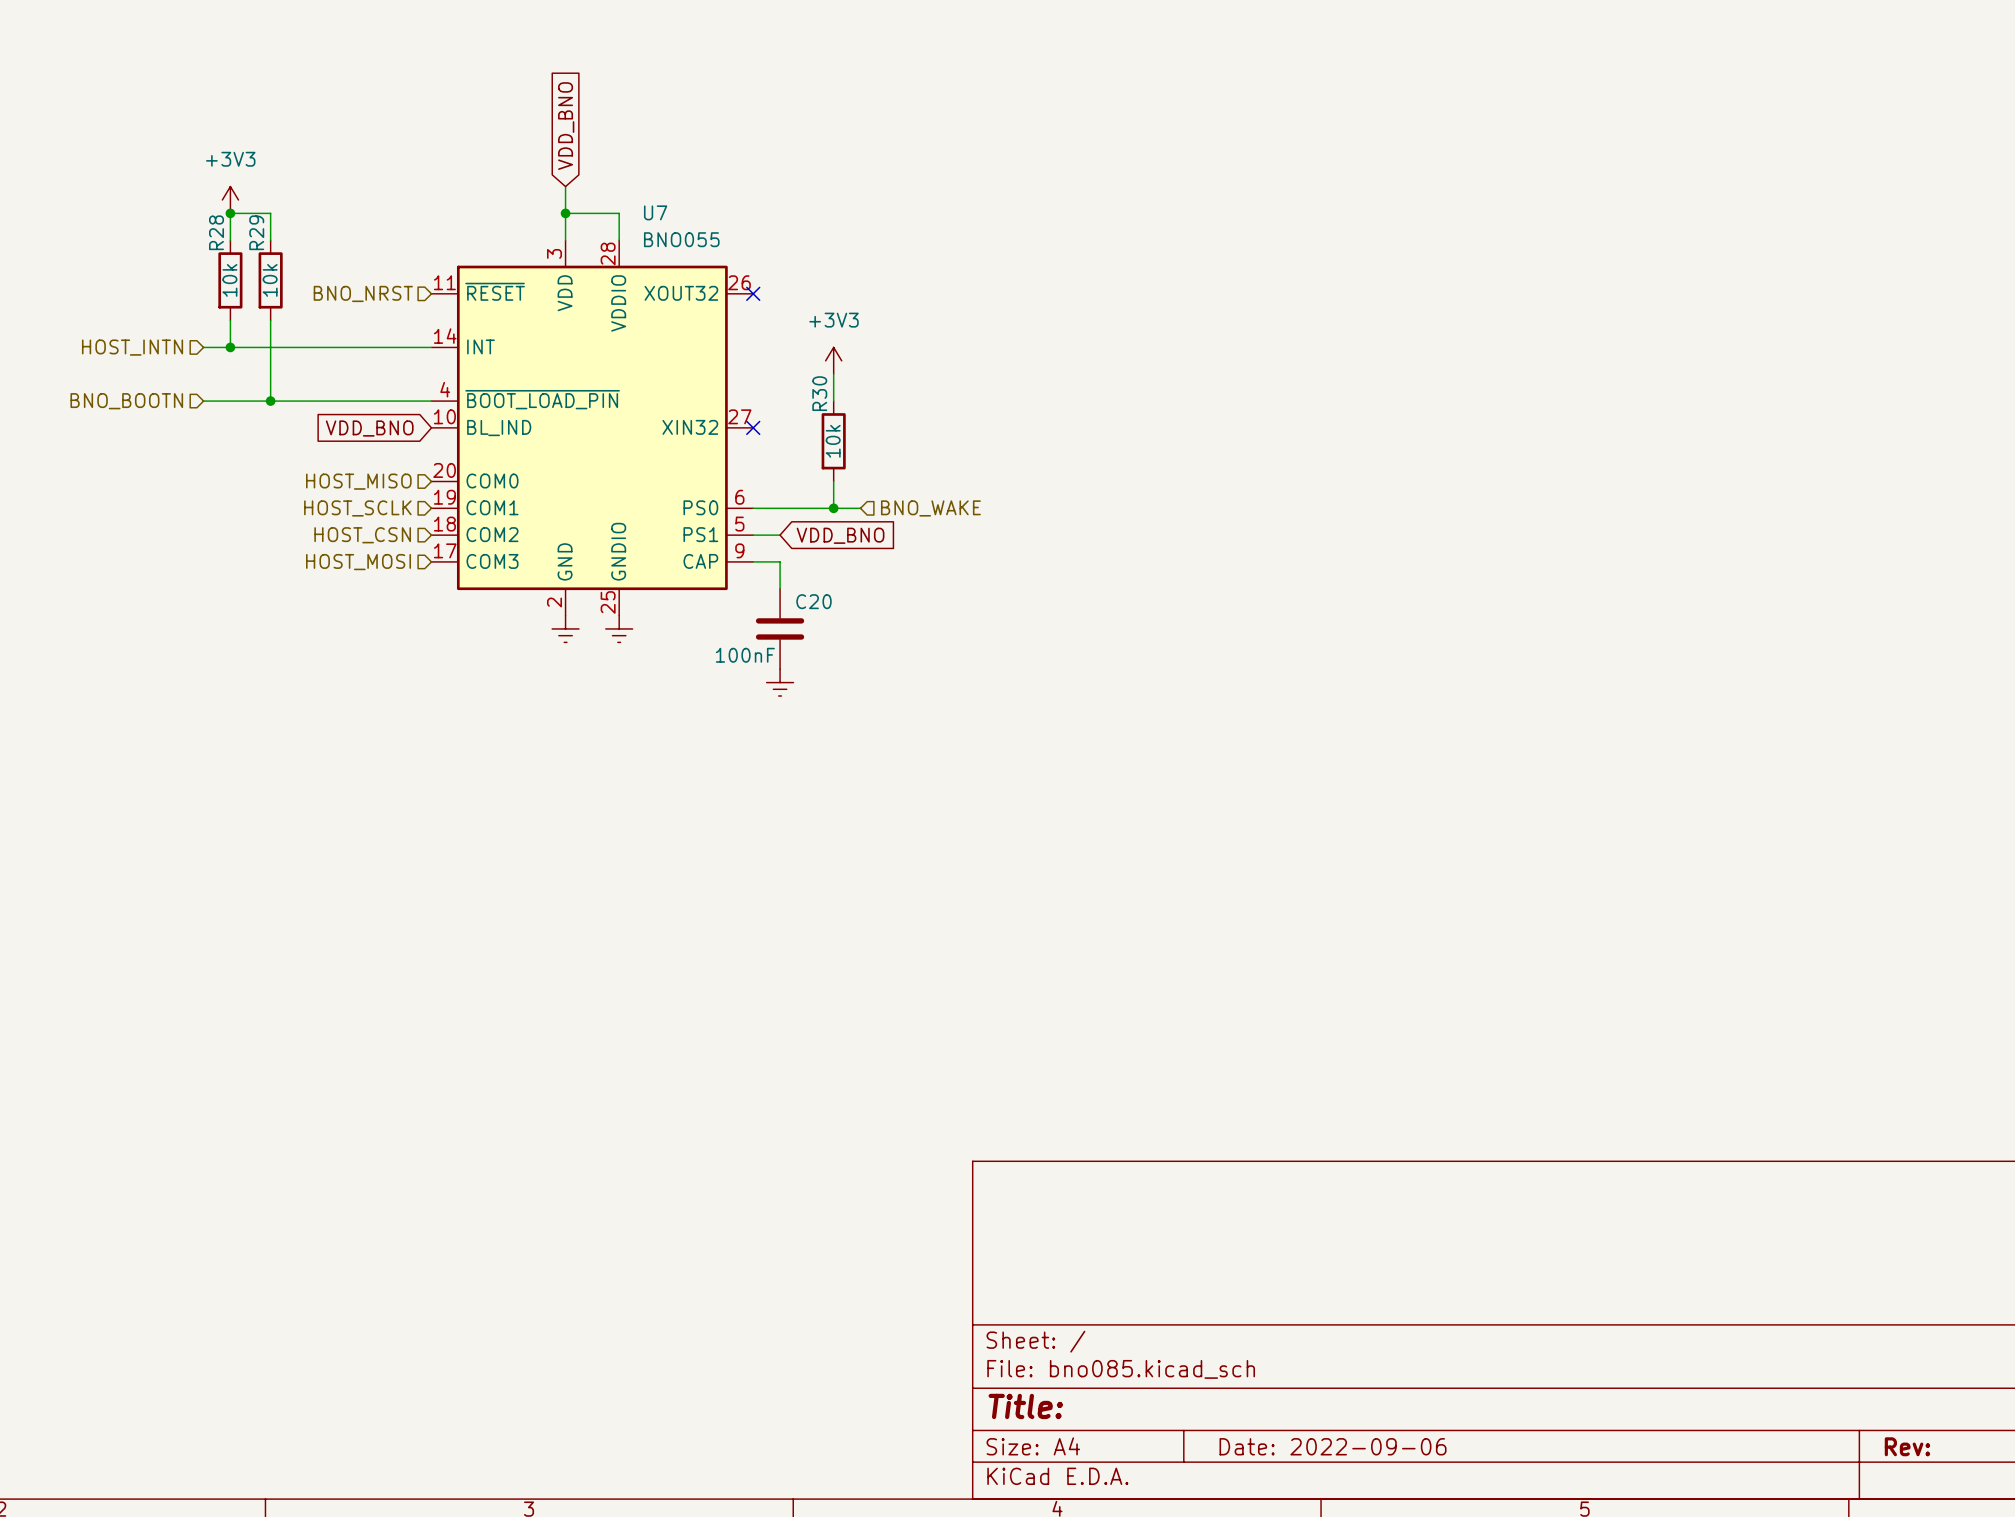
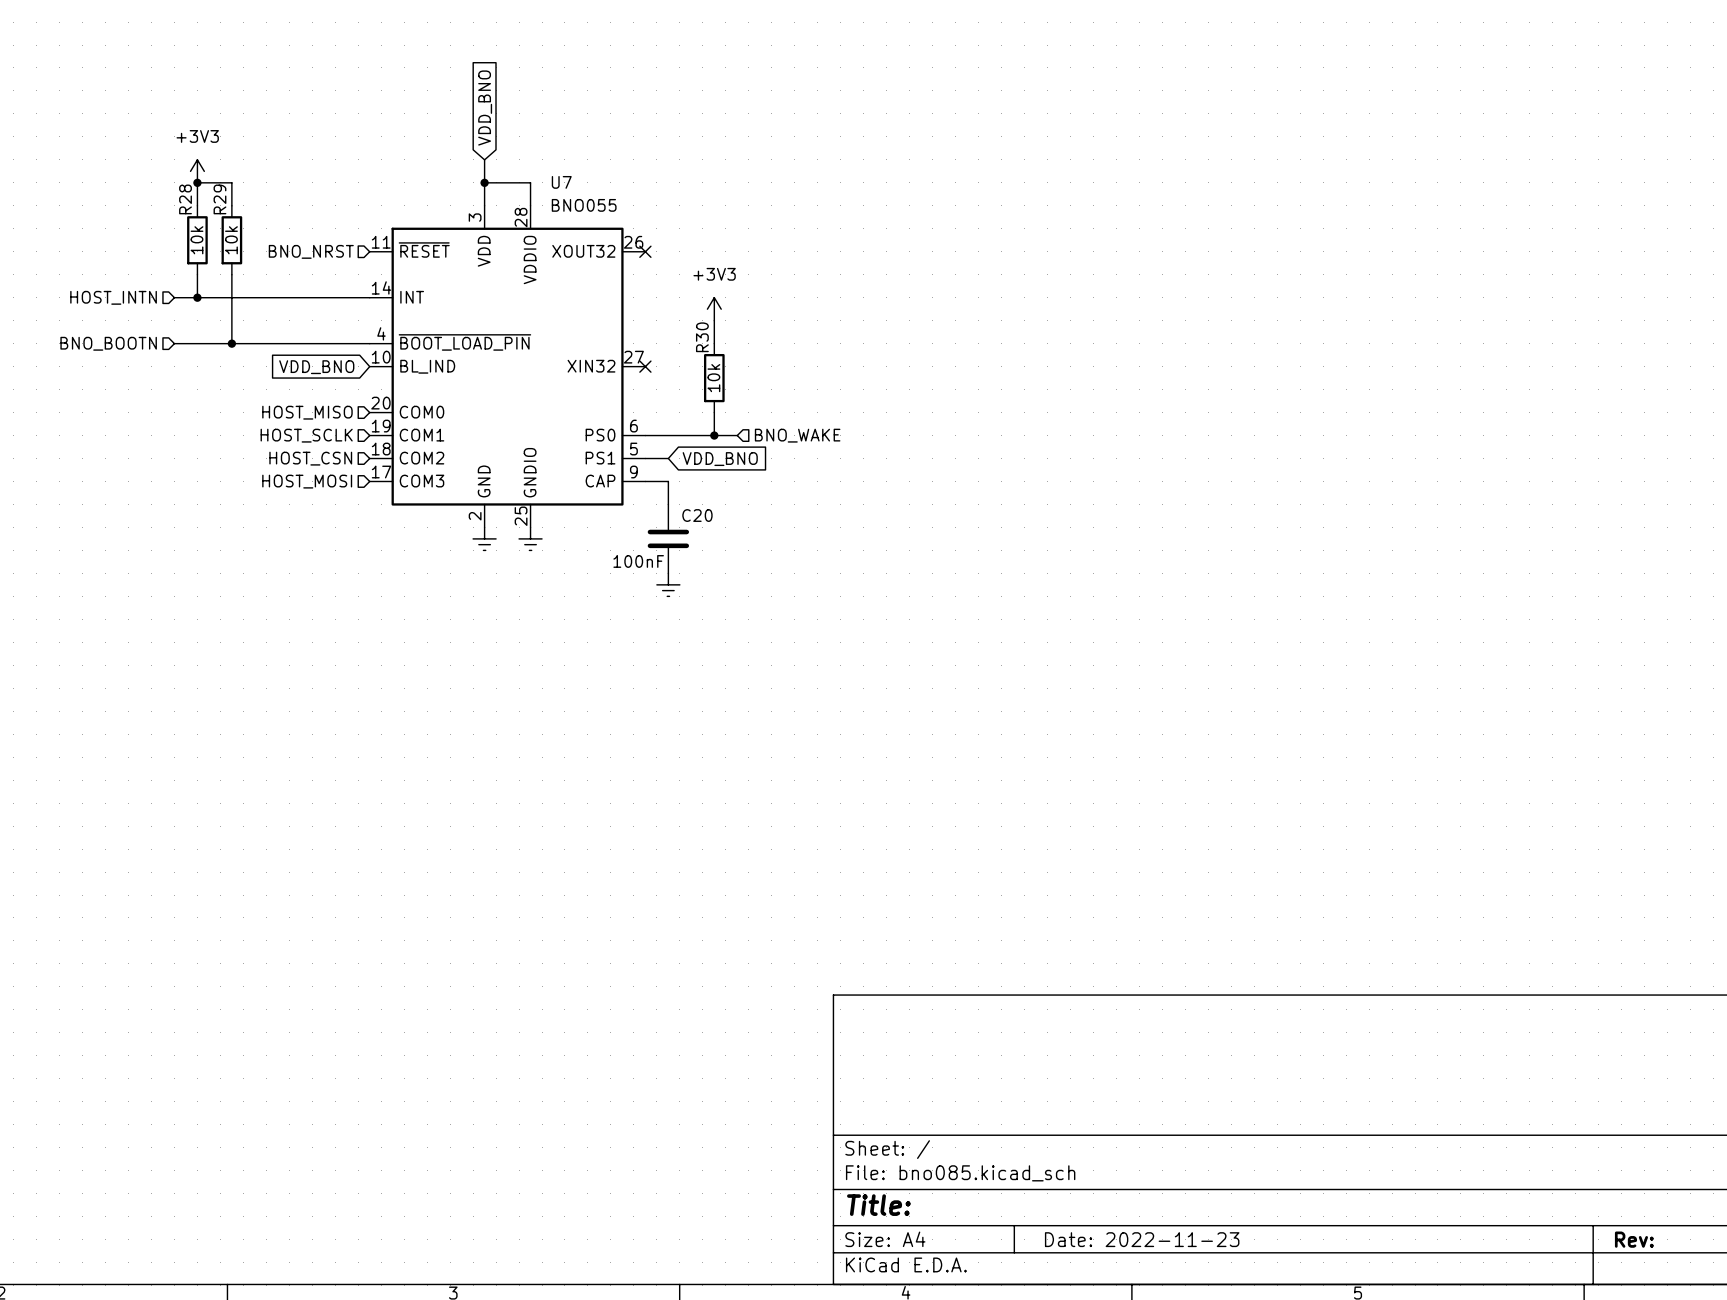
title block: Date: 2022-09-06 (1333, 1446) -> Date: 2022-11-23 (1142, 1239)

